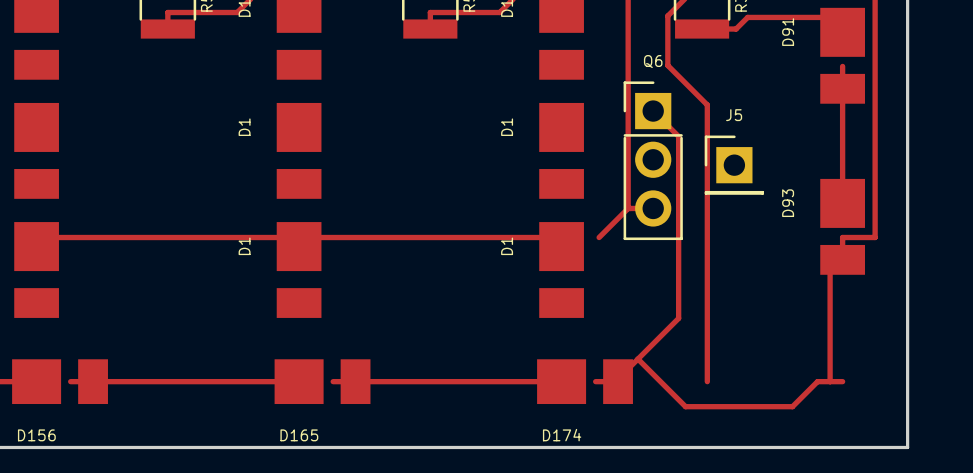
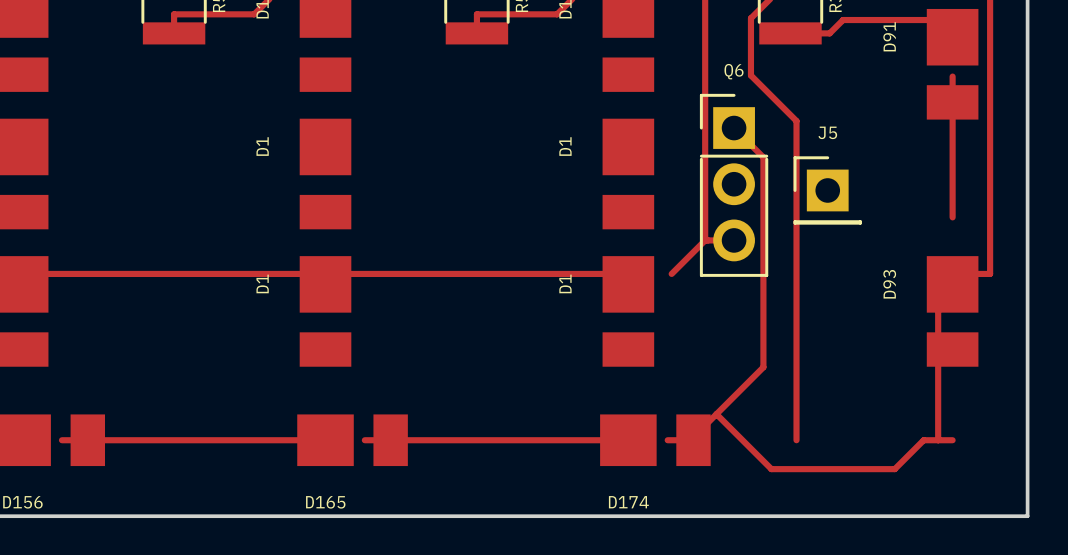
D93 position: (842, 226) -> (952, 311)

